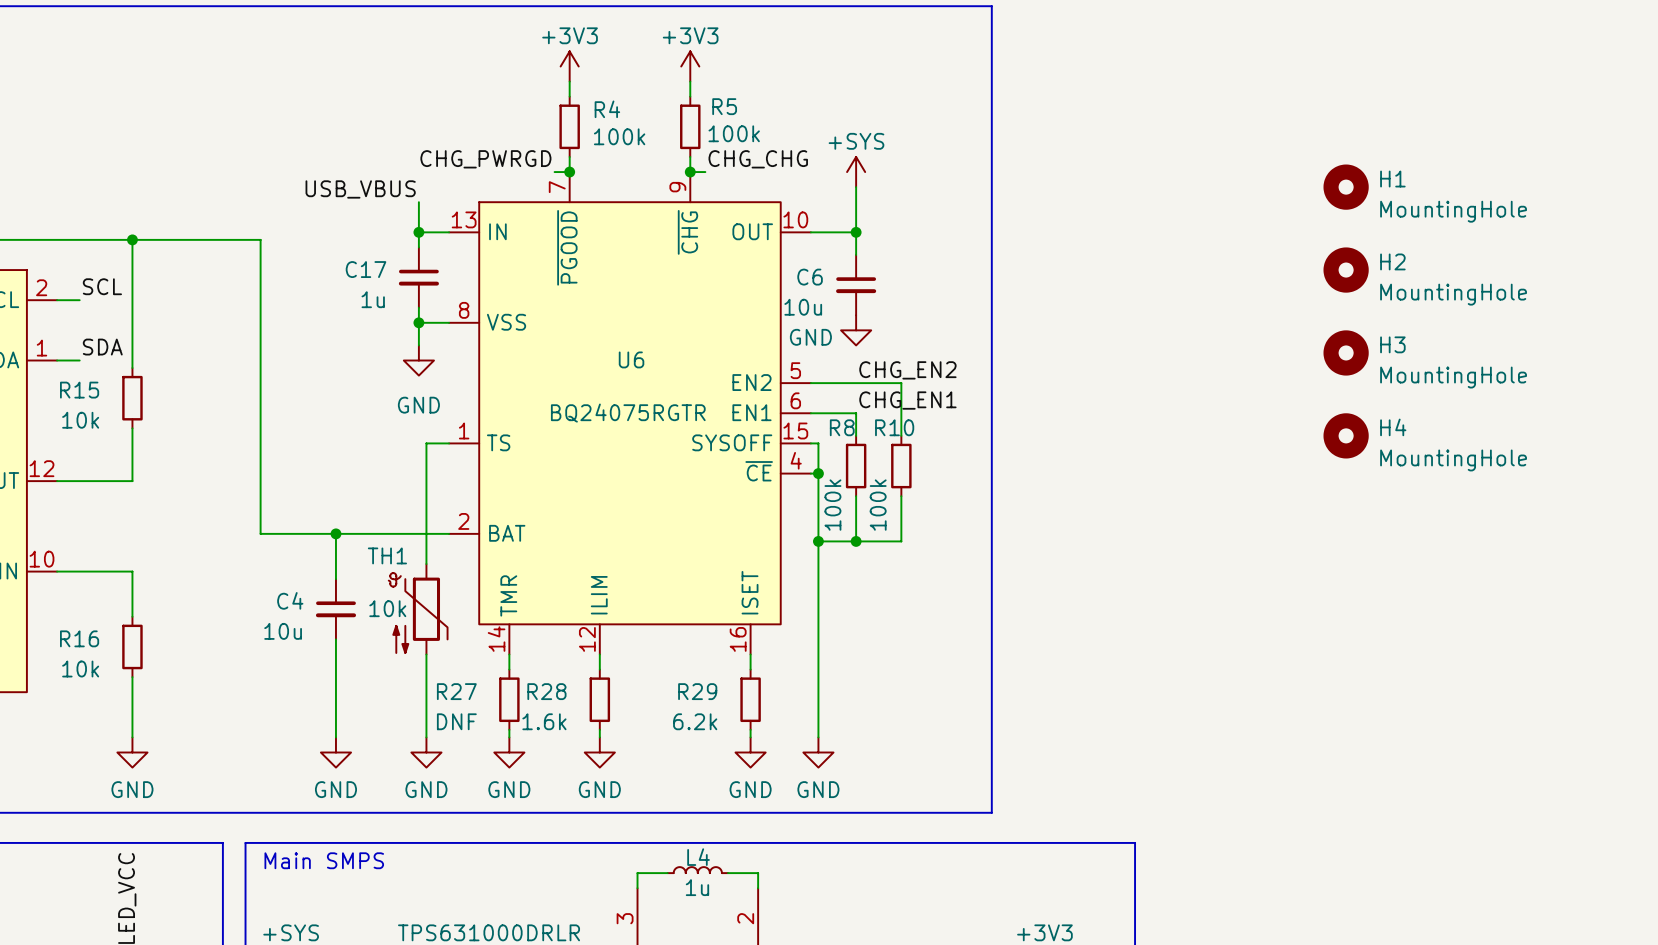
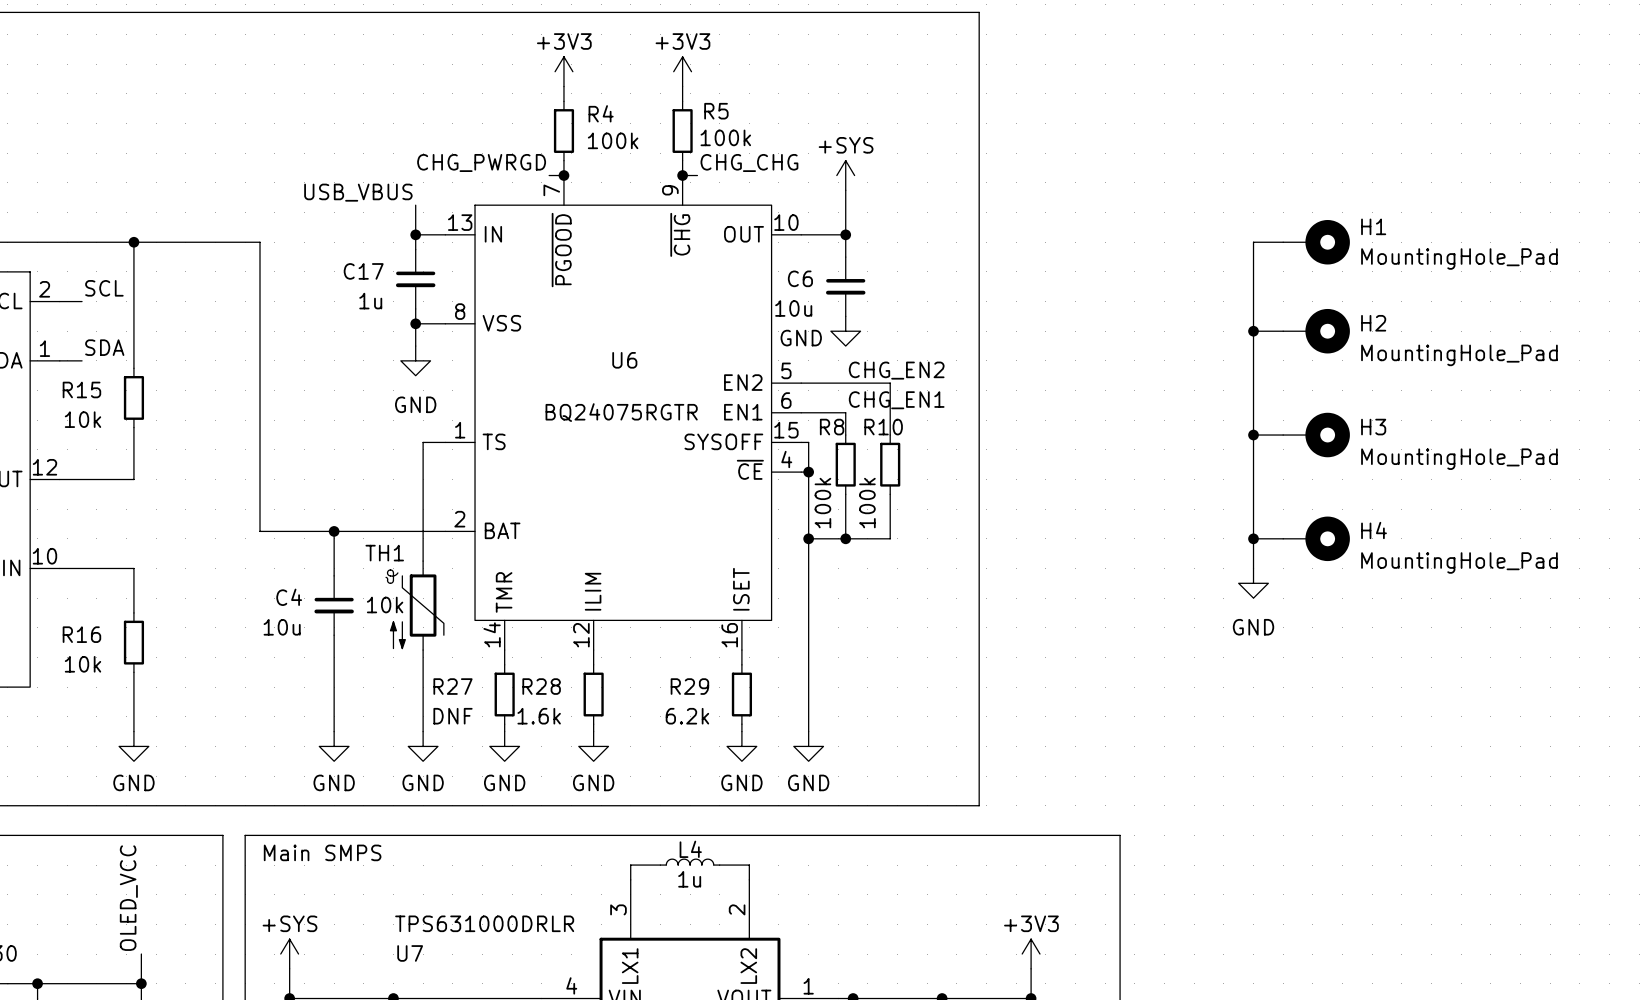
H1 symbol: [1323, 164, 1369, 210] -> [1283, 220, 1350, 265]
H1 value: MountingHole (1453, 211) -> MountingHole_Pad (1459, 258)
wire: none -> (1283, 242) (1253, 242) (1253, 568)
H2 symbol: [1323, 247, 1369, 293] -> [1283, 308, 1350, 354]
H2 value: MountingHole (1453, 294) -> MountingHole_Pad (1459, 355)
wire: none -> (1253, 331) (1283, 331)
junction: none -> (1253, 331)
H3 symbol: [1323, 330, 1369, 376] -> [1283, 412, 1350, 458]
H3 value: MountingHole (1453, 377) -> MountingHole_Pad (1459, 459)
H4 symbol: [1323, 413, 1369, 459] -> [1283, 516, 1350, 562]
wire: none -> (1253, 435) (1283, 435)
junction: none -> (1253, 435)
H4 value: MountingHole (1453, 460) -> MountingHole_Pad (1459, 562)
wire: none -> (1253, 538) (1283, 538)
junction: none -> (1253, 538)
power symbol: none -> GND (1253, 583)

